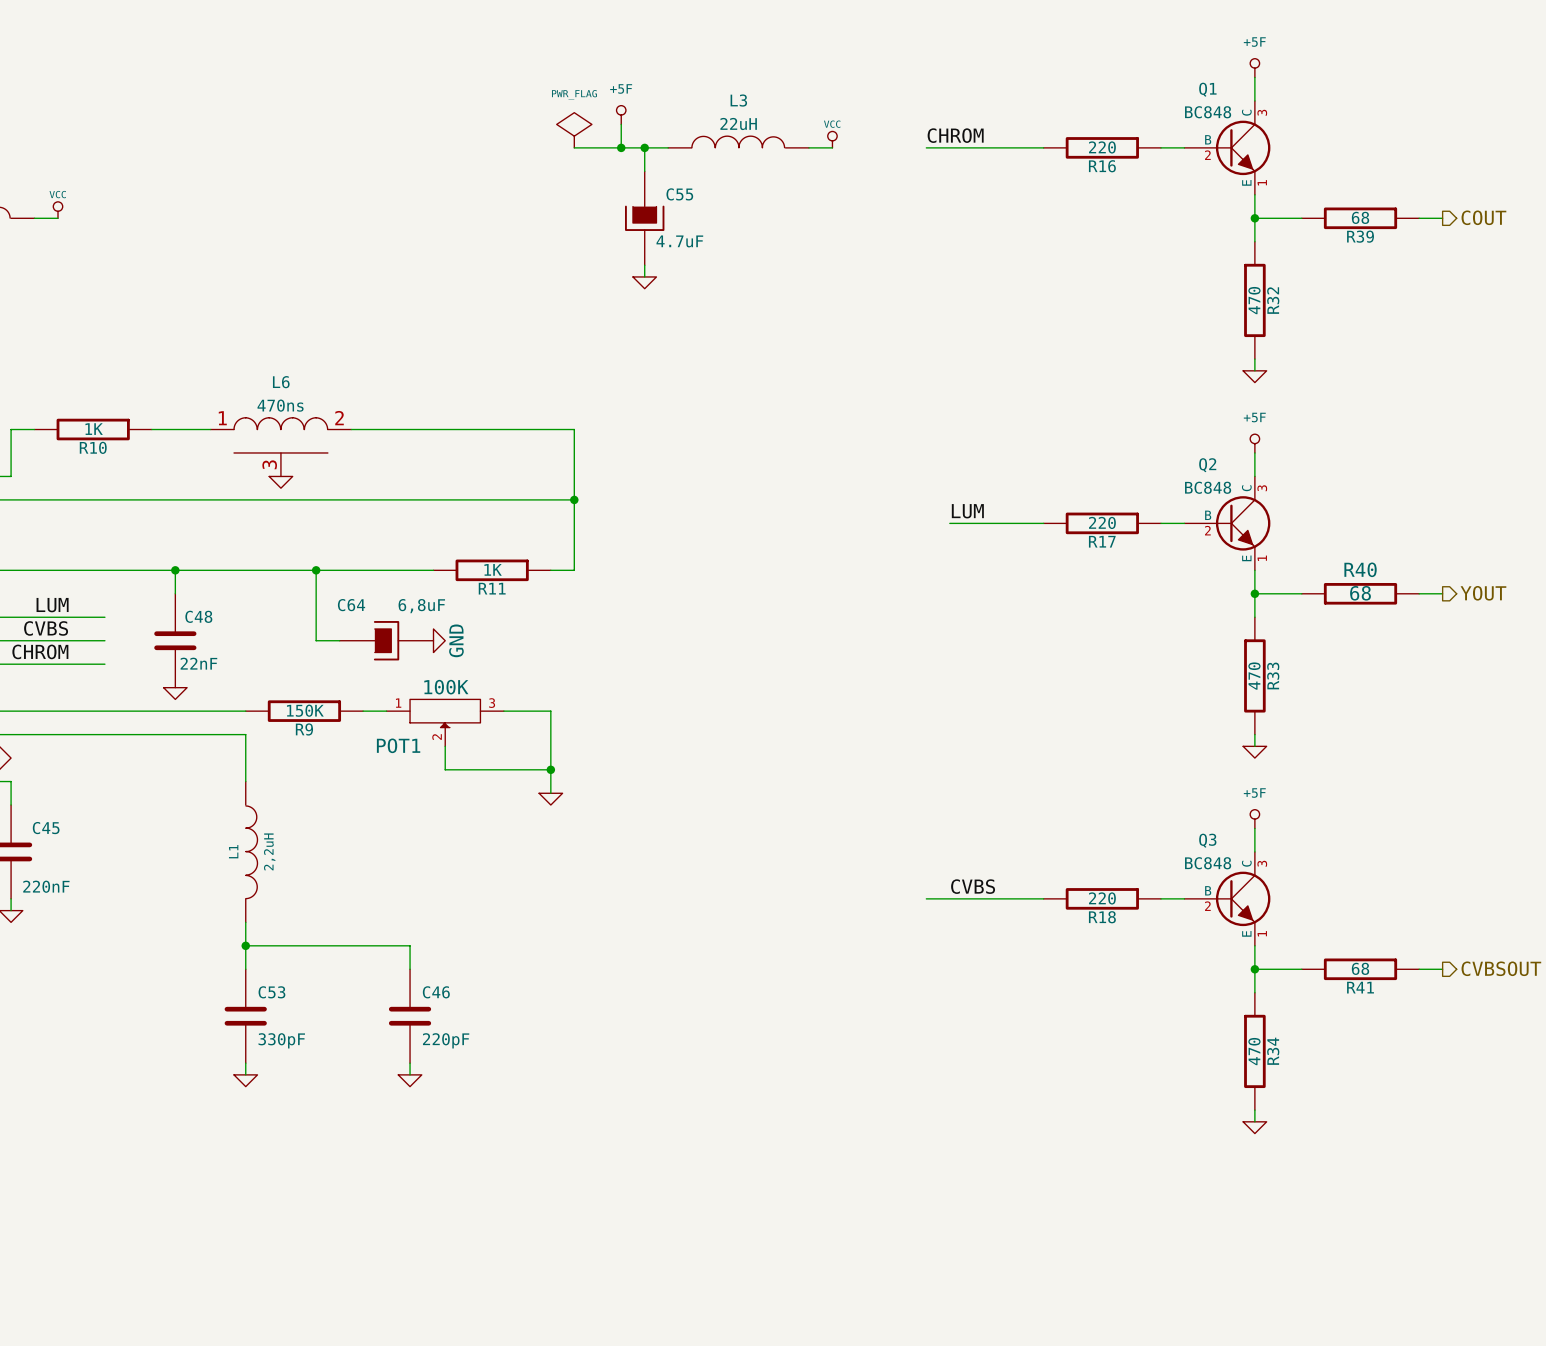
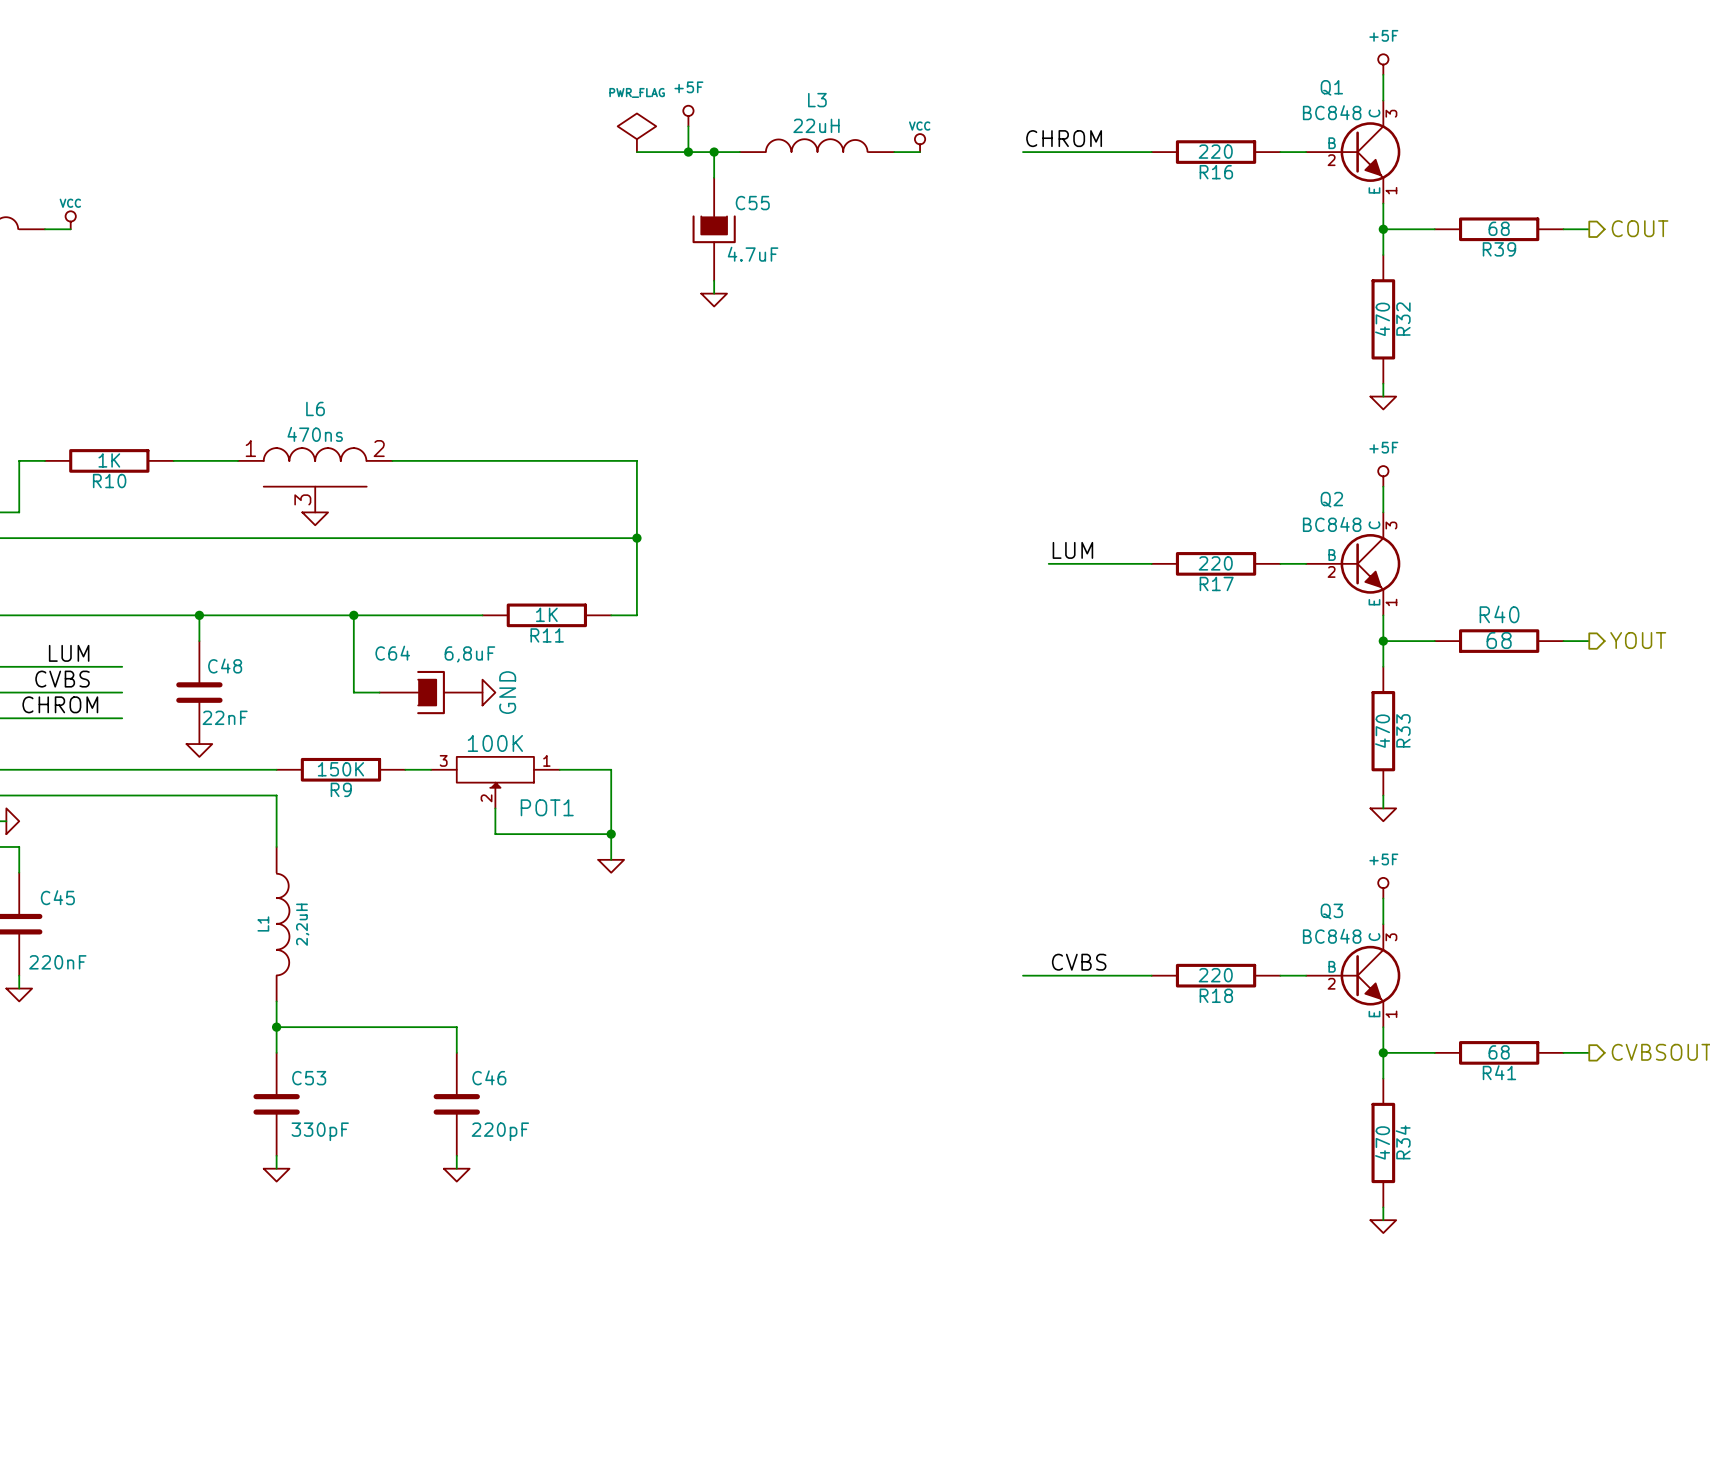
POT1 flip: as is (445, 713) -> left-right (495, 772)

